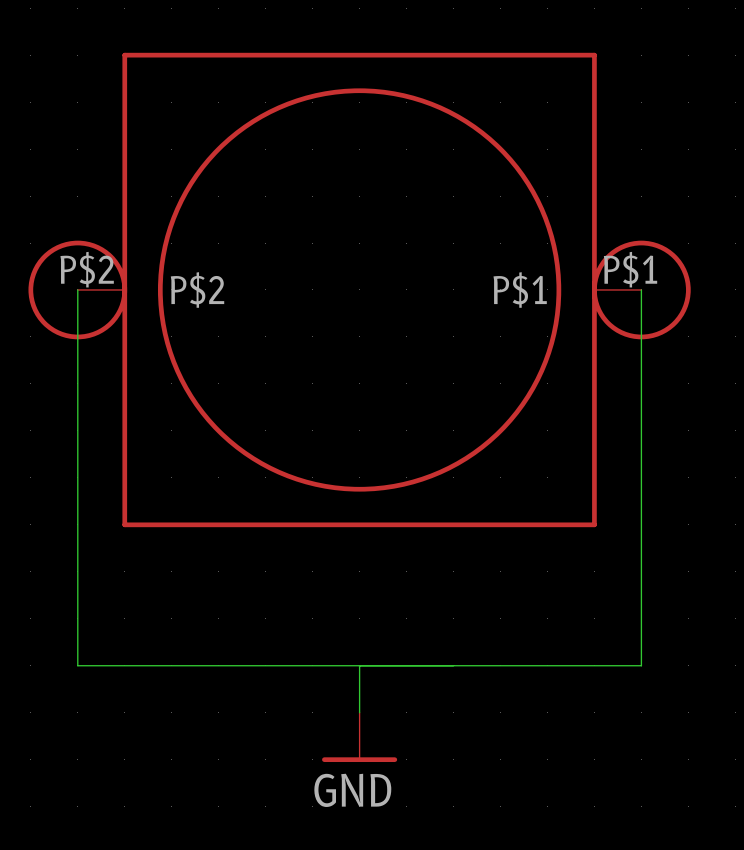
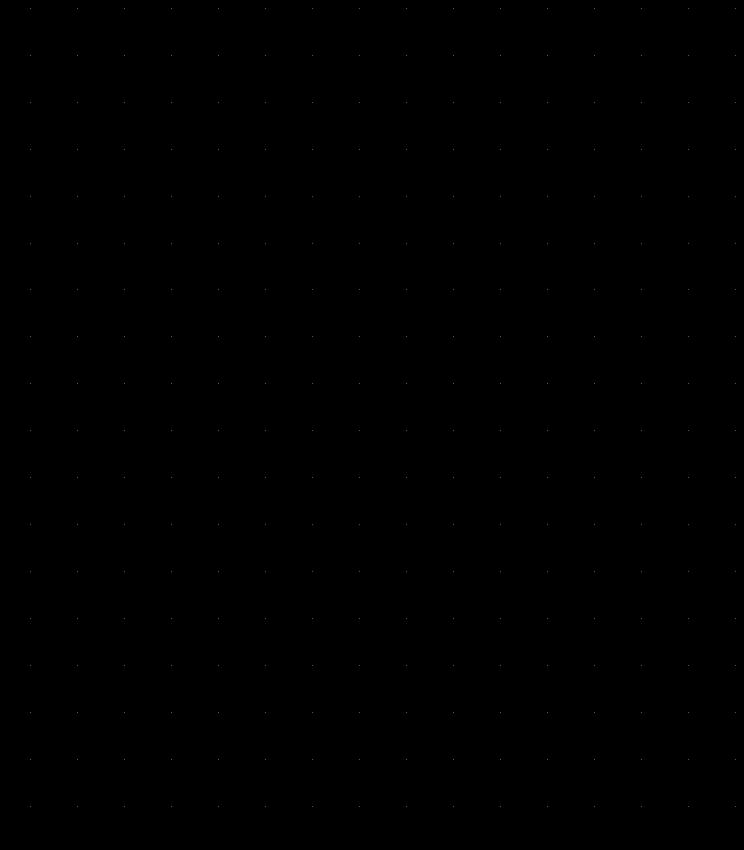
wire: (77, 289) (77, 665) (641, 665) (641, 289) -> none
part: (359, 289) -> none
wire: (359, 665) (359, 712) -> none
power symbol: GND (359, 737) -> none

